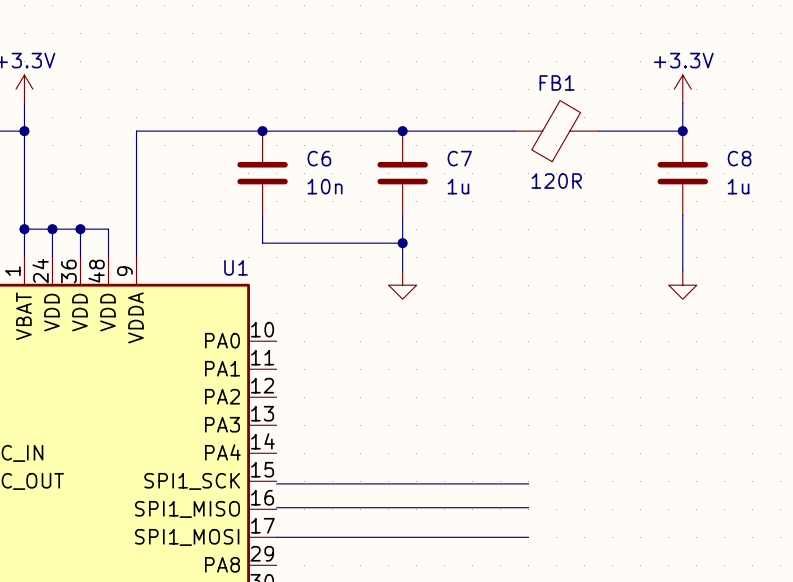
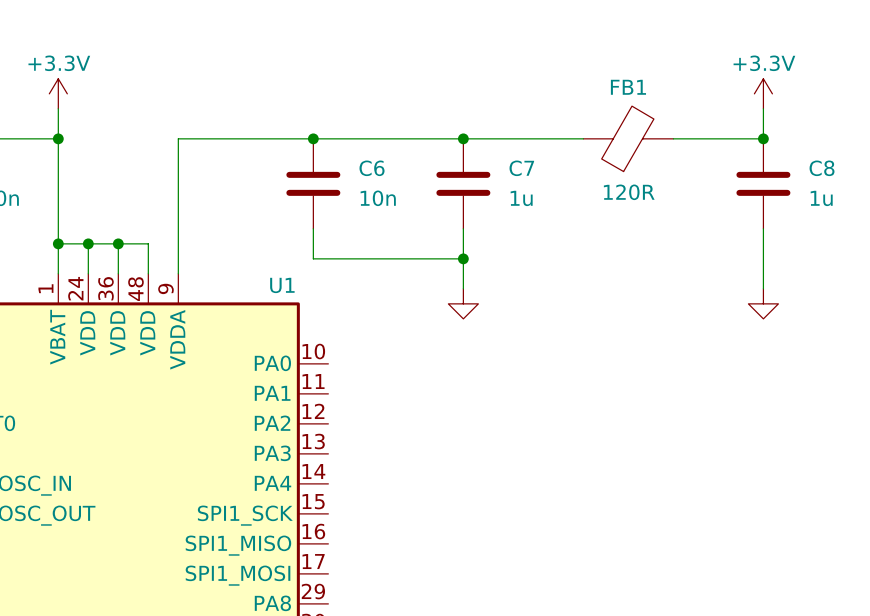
wire: (276, 483) (528, 483) -> none
wire: (276, 507) (528, 507) -> none
wire: (276, 537) (528, 537) -> none

